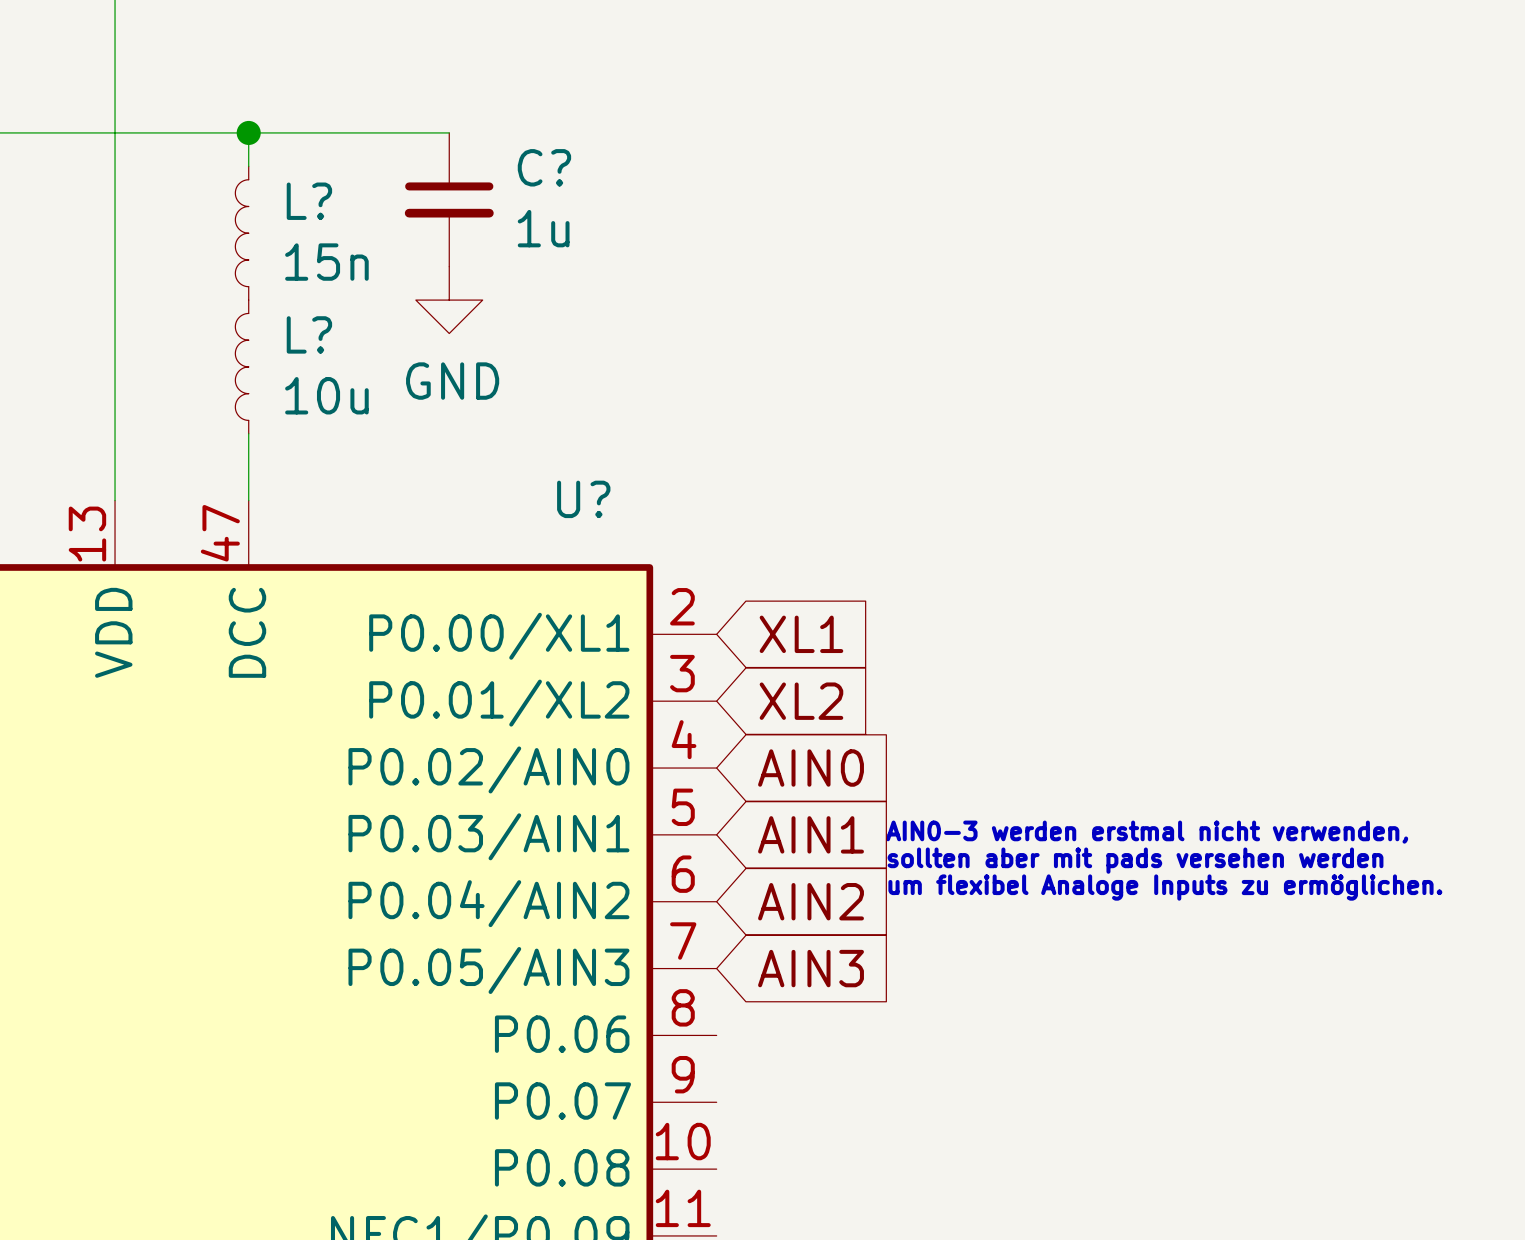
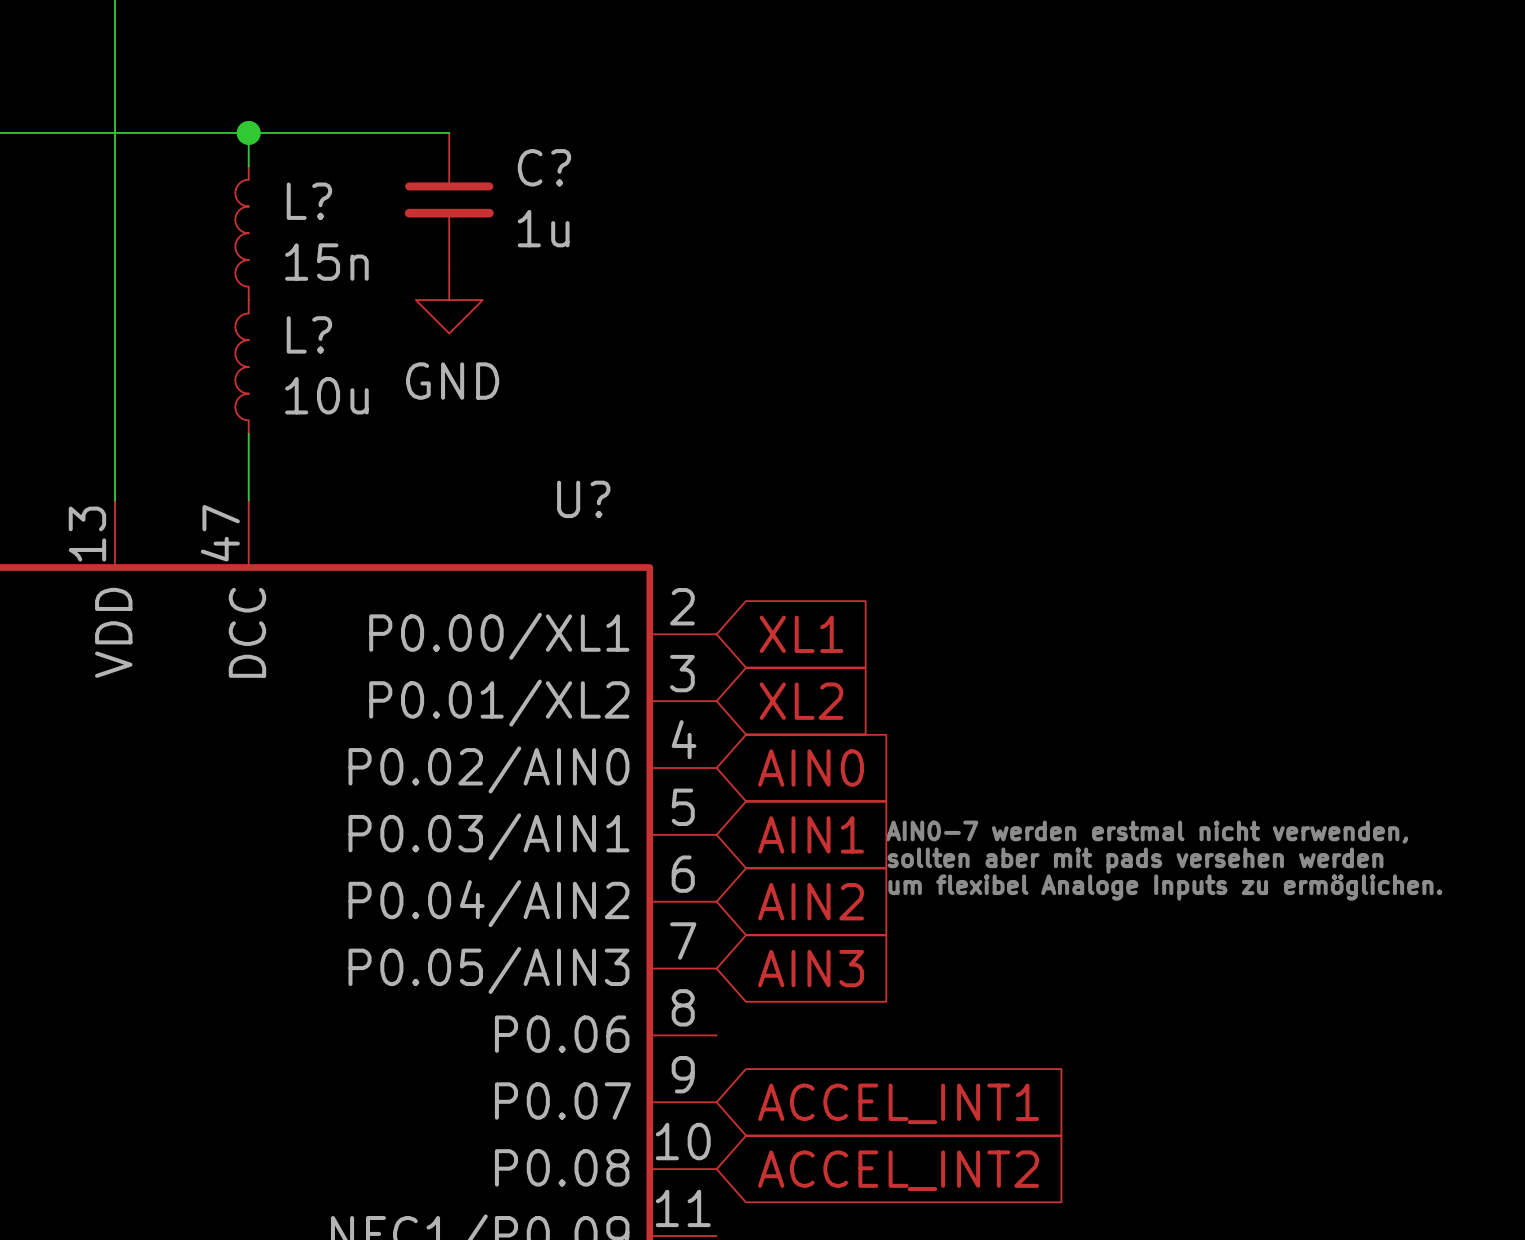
text: AIN0-3 werden erstmal nicht verwenden, (1147, 832) -> AIN0-7 werden erstmal nicht verwenden, (1147, 832)
global label: none -> ACCEL_INT1 (898, 1103)
global label: none -> ACCEL_INT2 (898, 1170)

